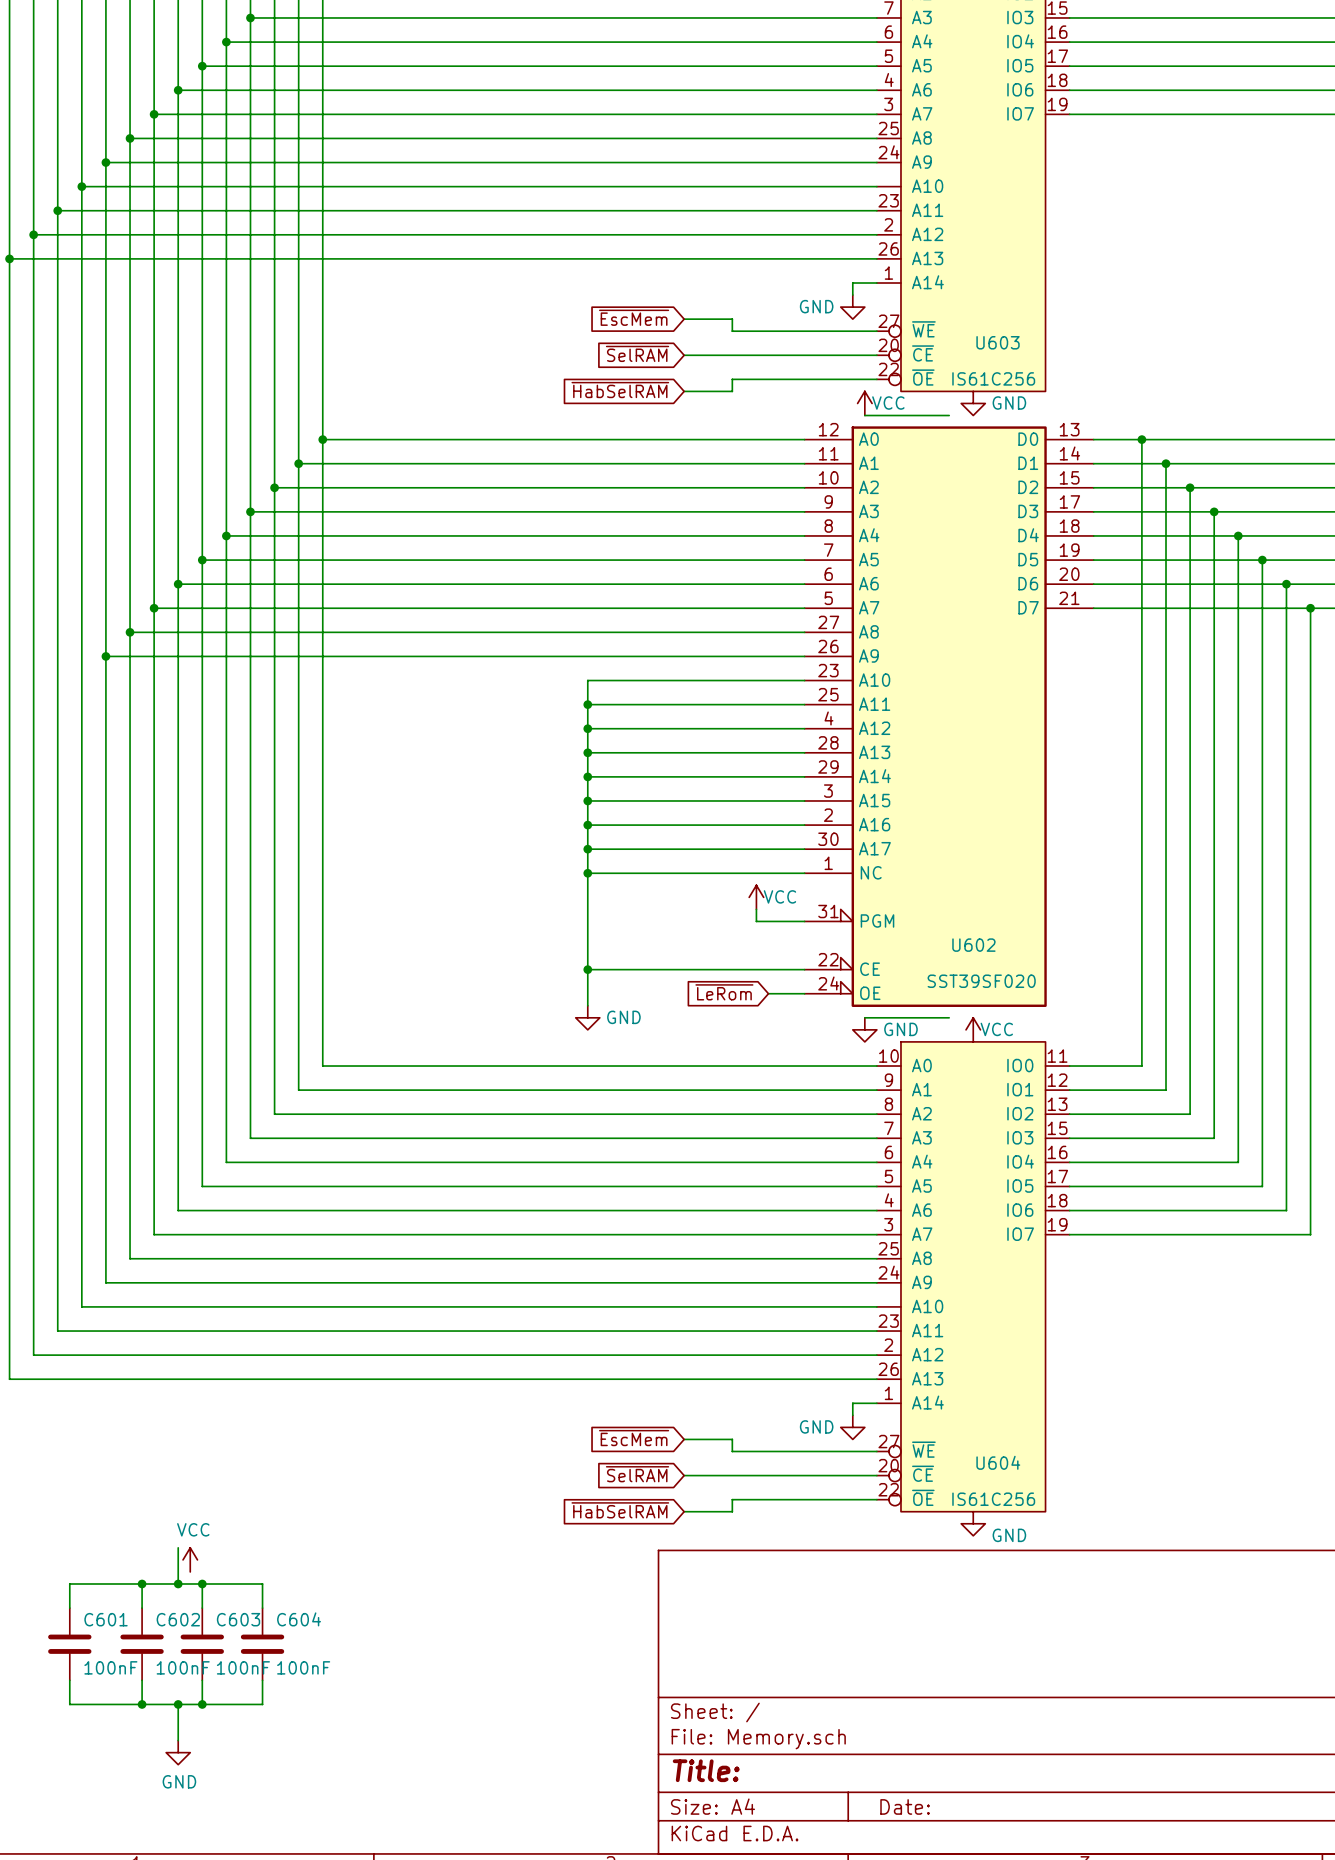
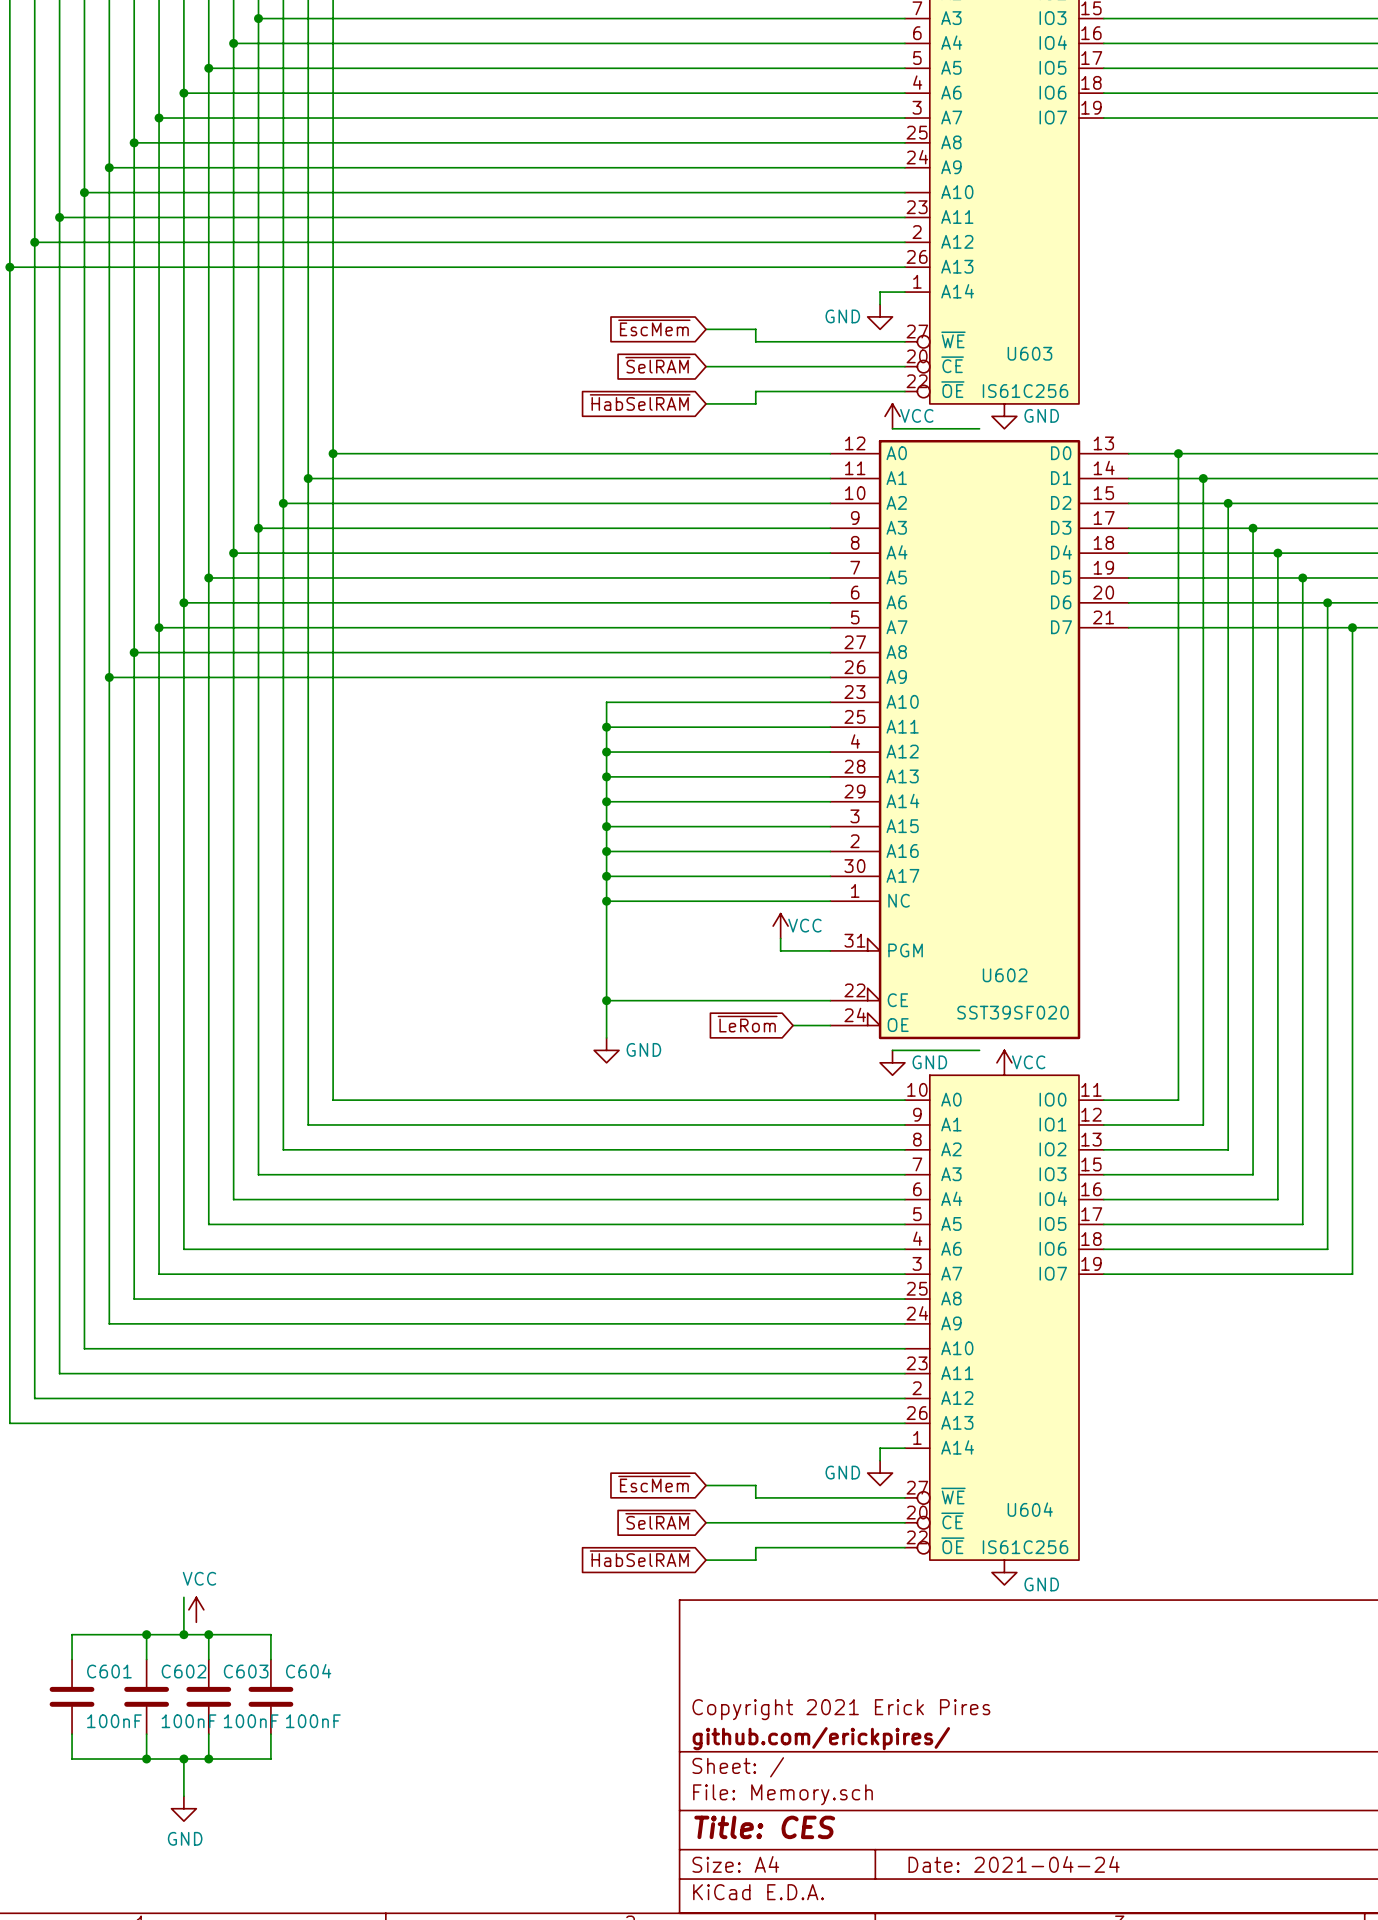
title block: none -> Copyright 2021 Erick Pires (841, 1709)
title block: none -> github.com/erickpires/ (821, 1738)
title block: Title: (706, 1770) -> Title: CES (764, 1827)
title block: Date: (905, 1806) -> Date: 2021-04-24 (1014, 1864)

